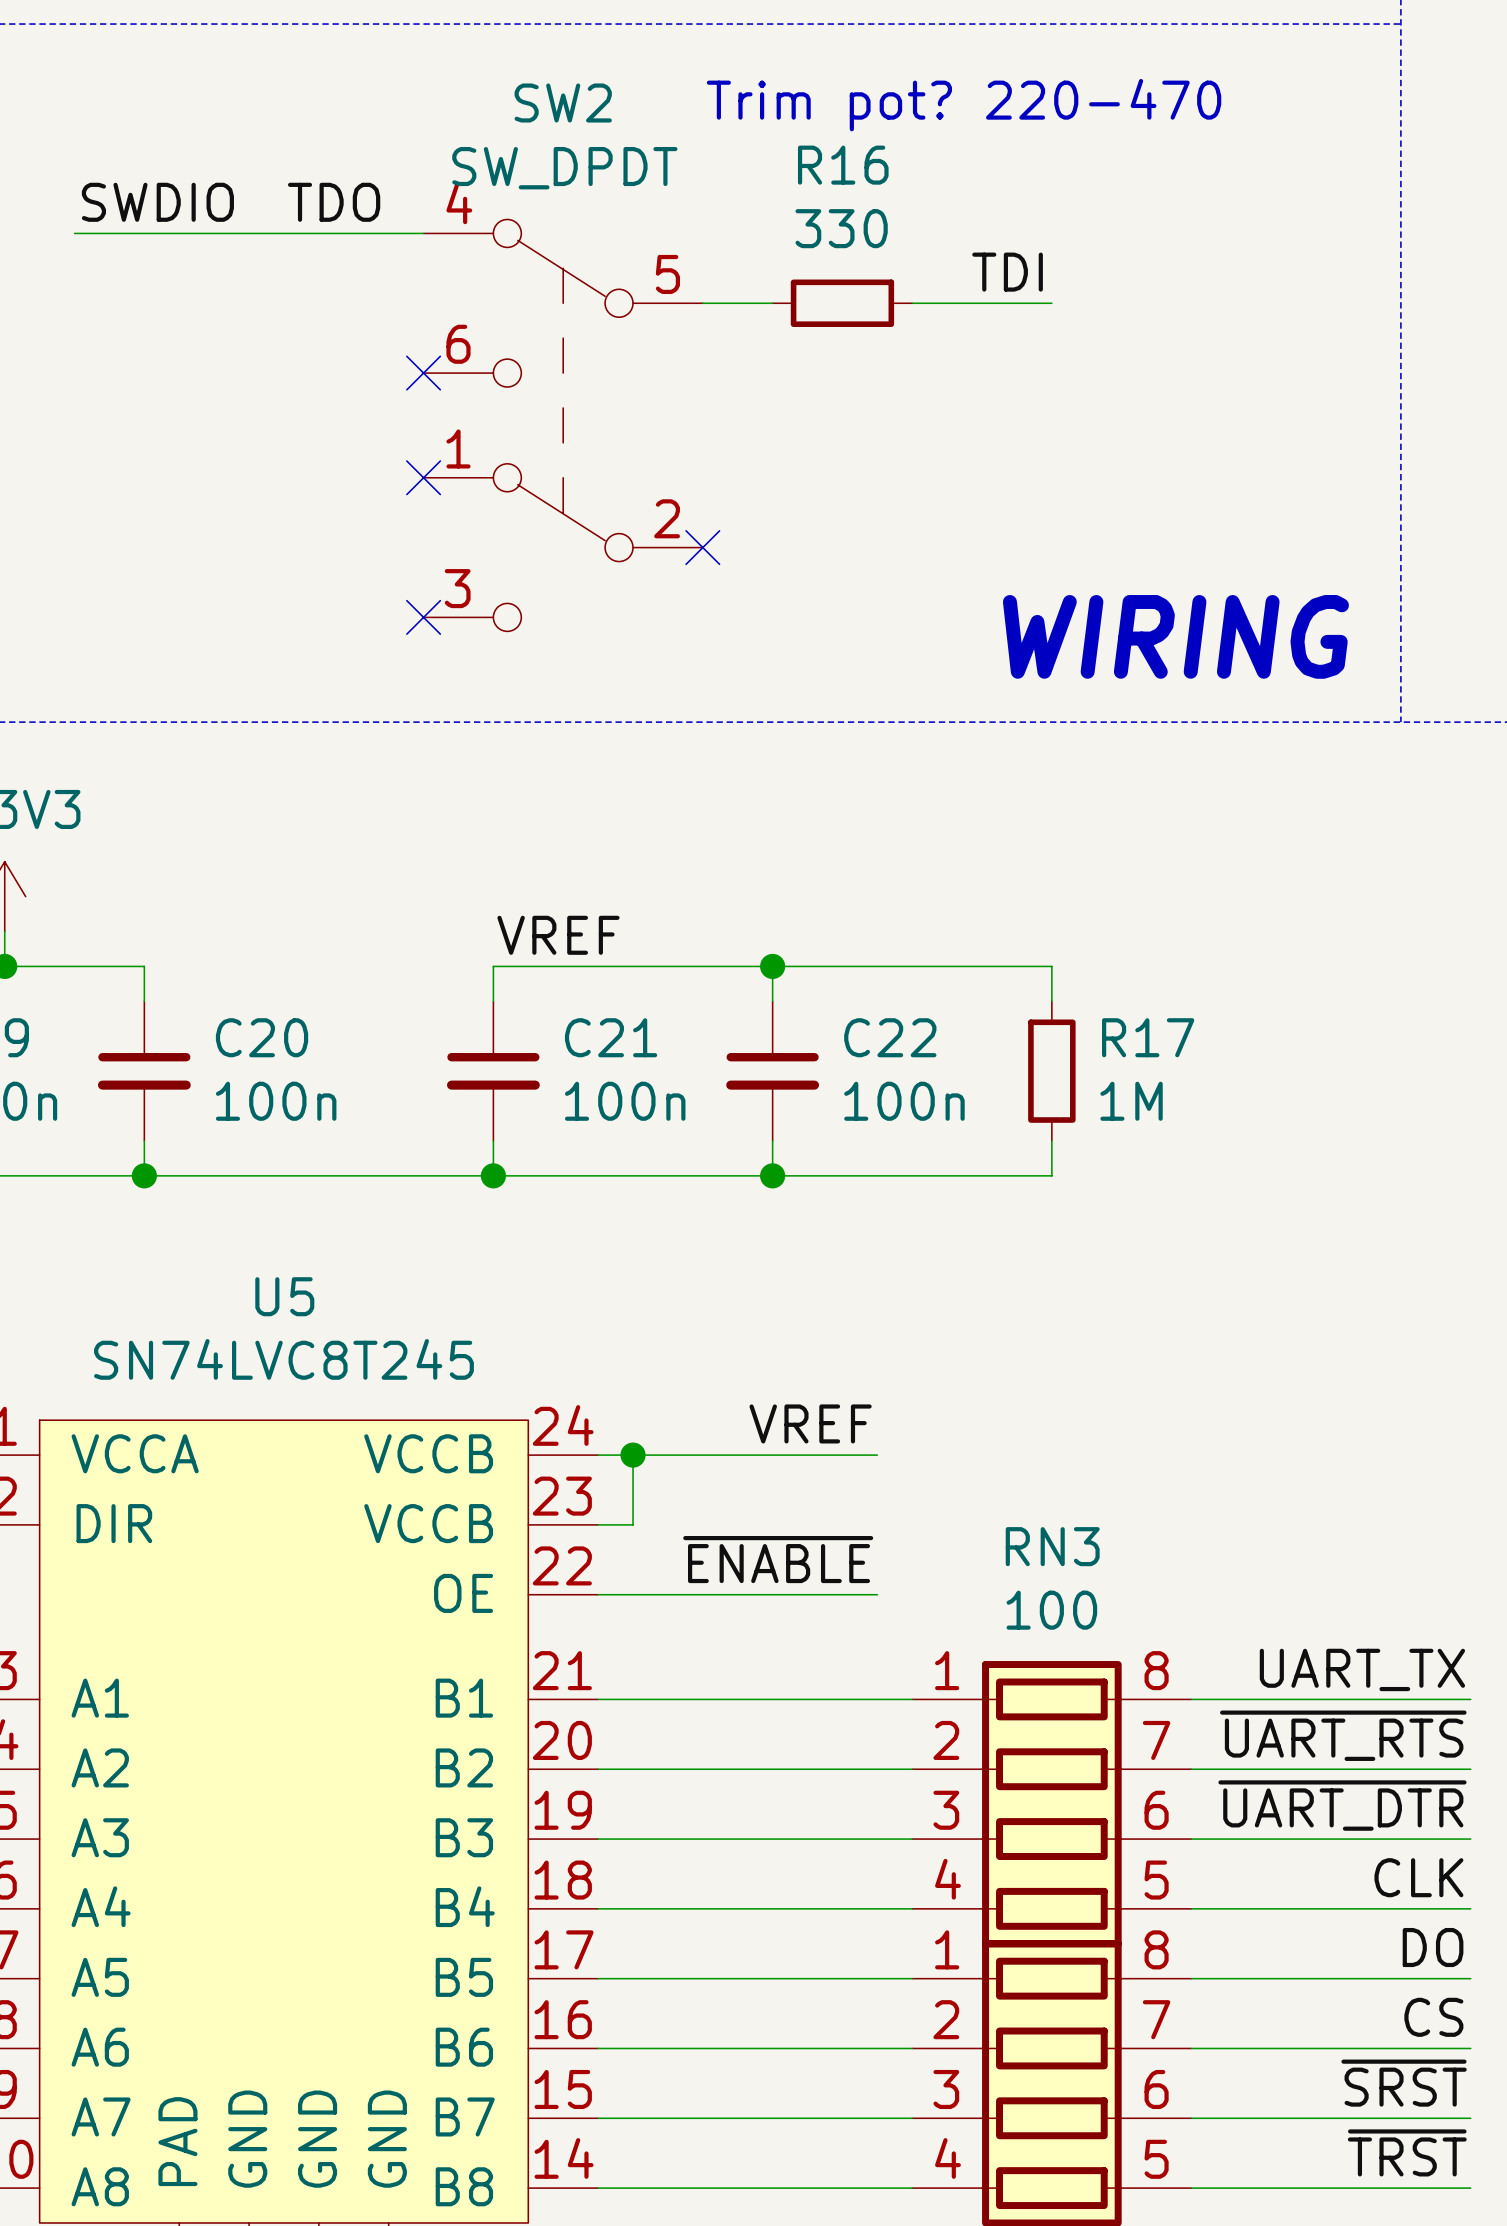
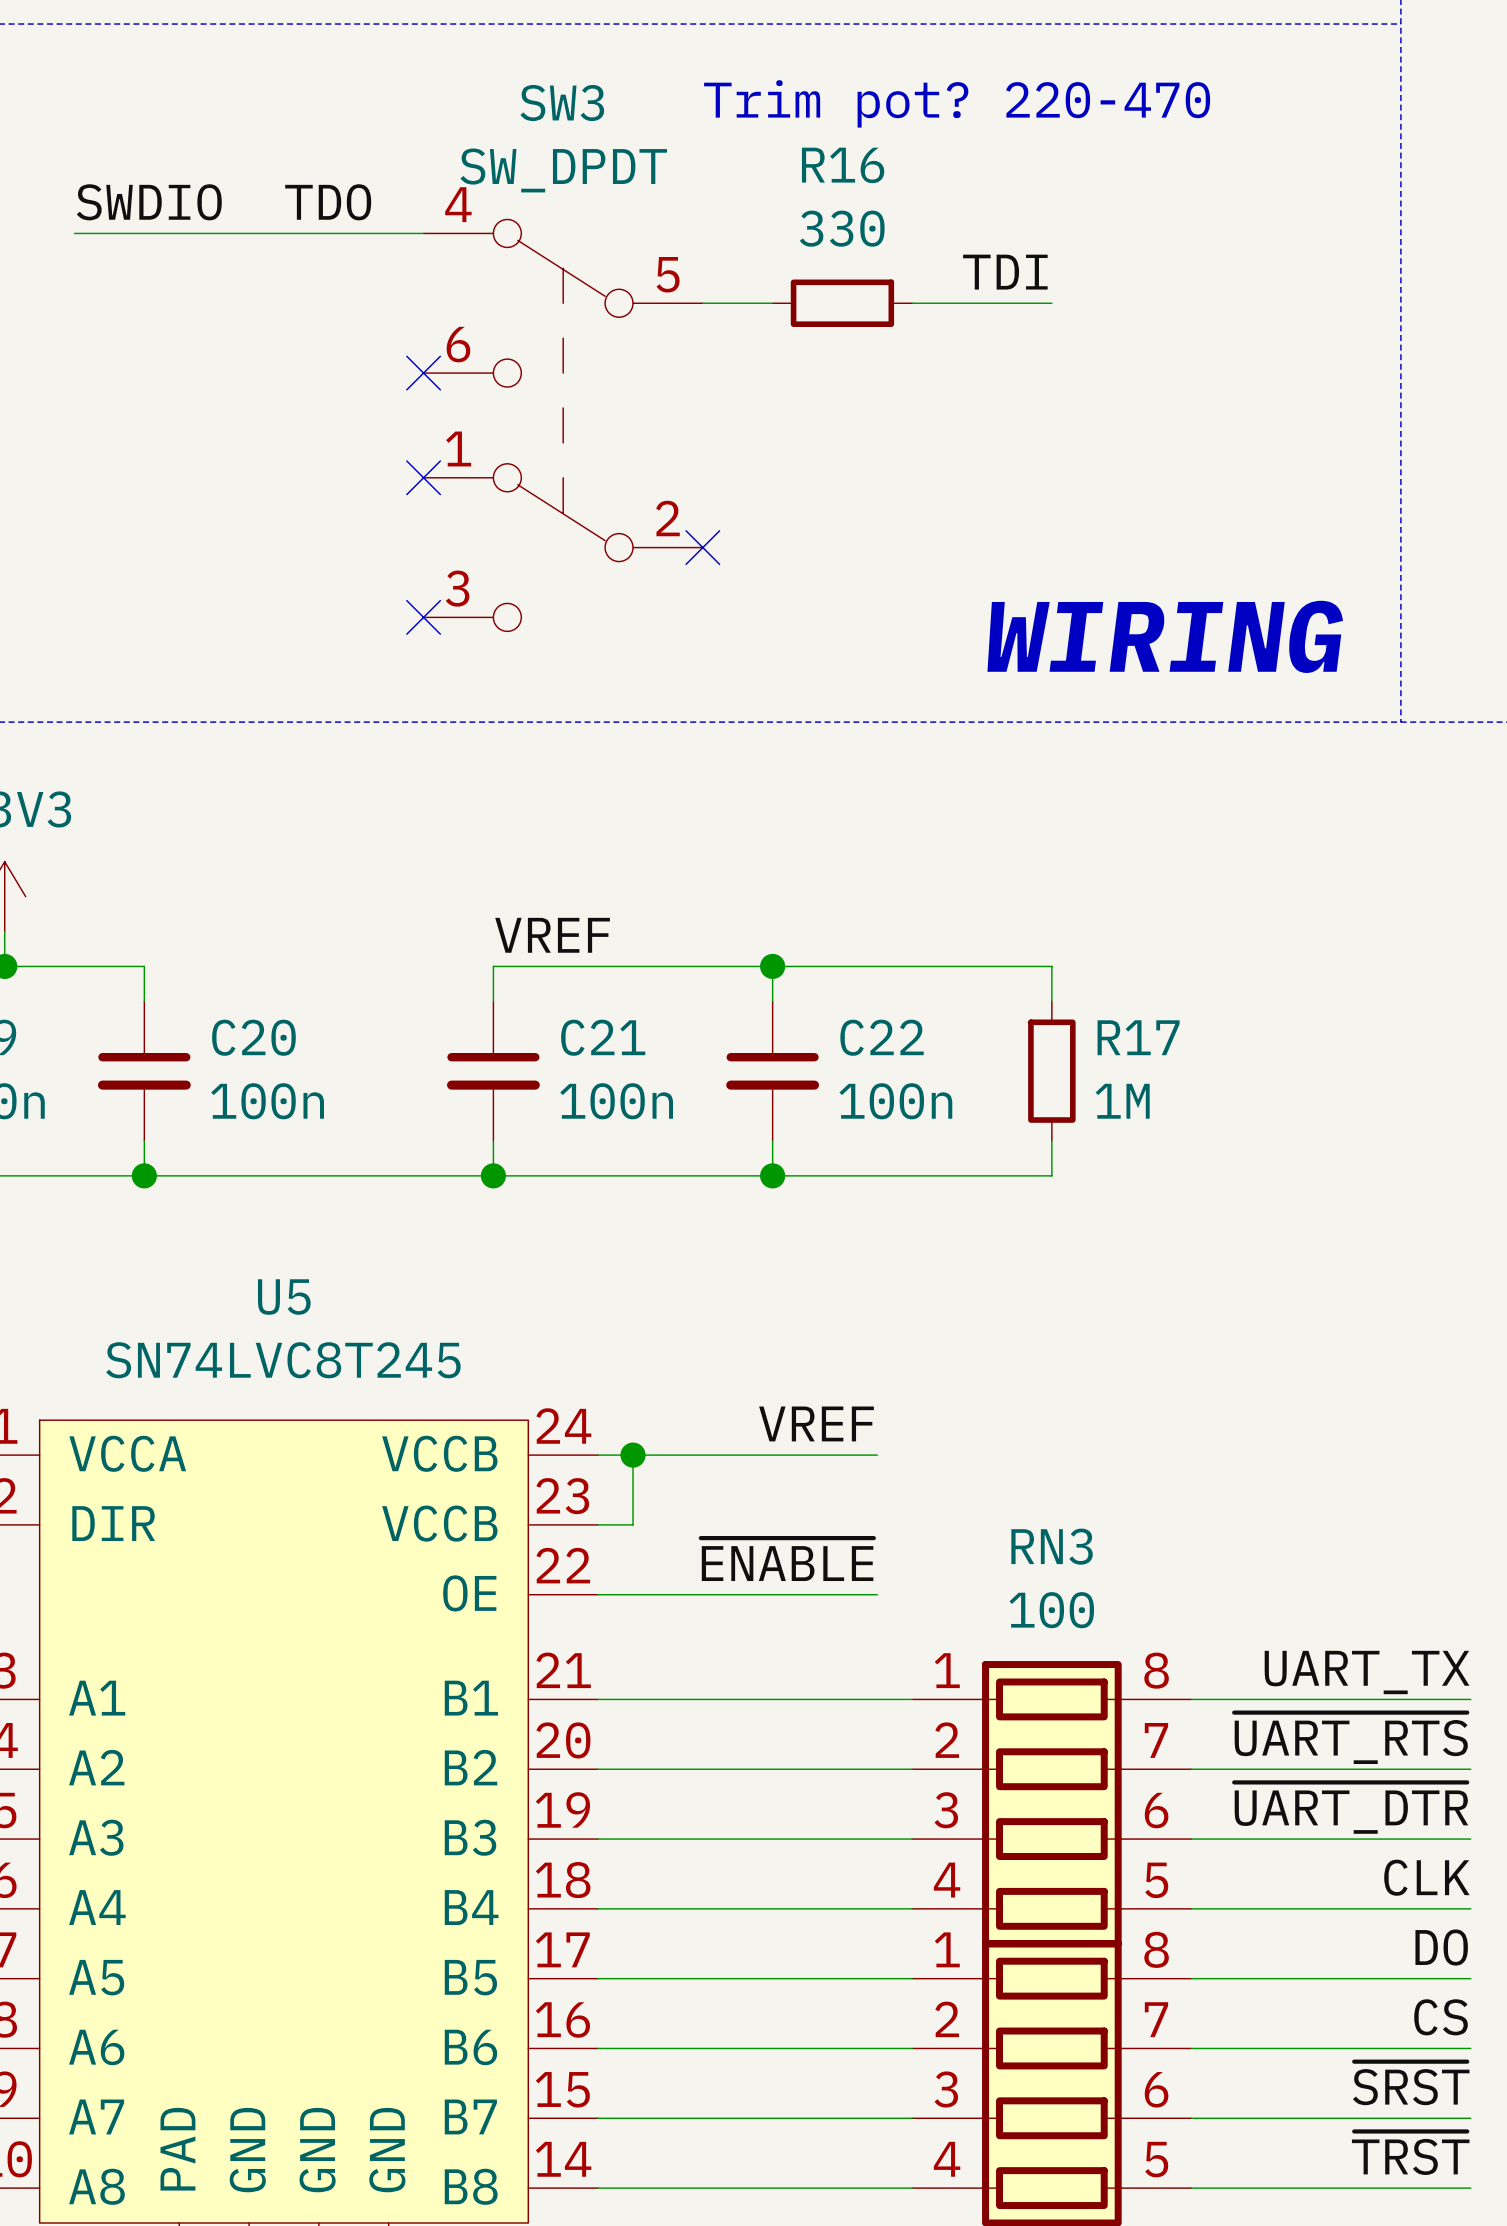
SW2 name: SW2 (563, 103) -> SW3 (562, 103)

